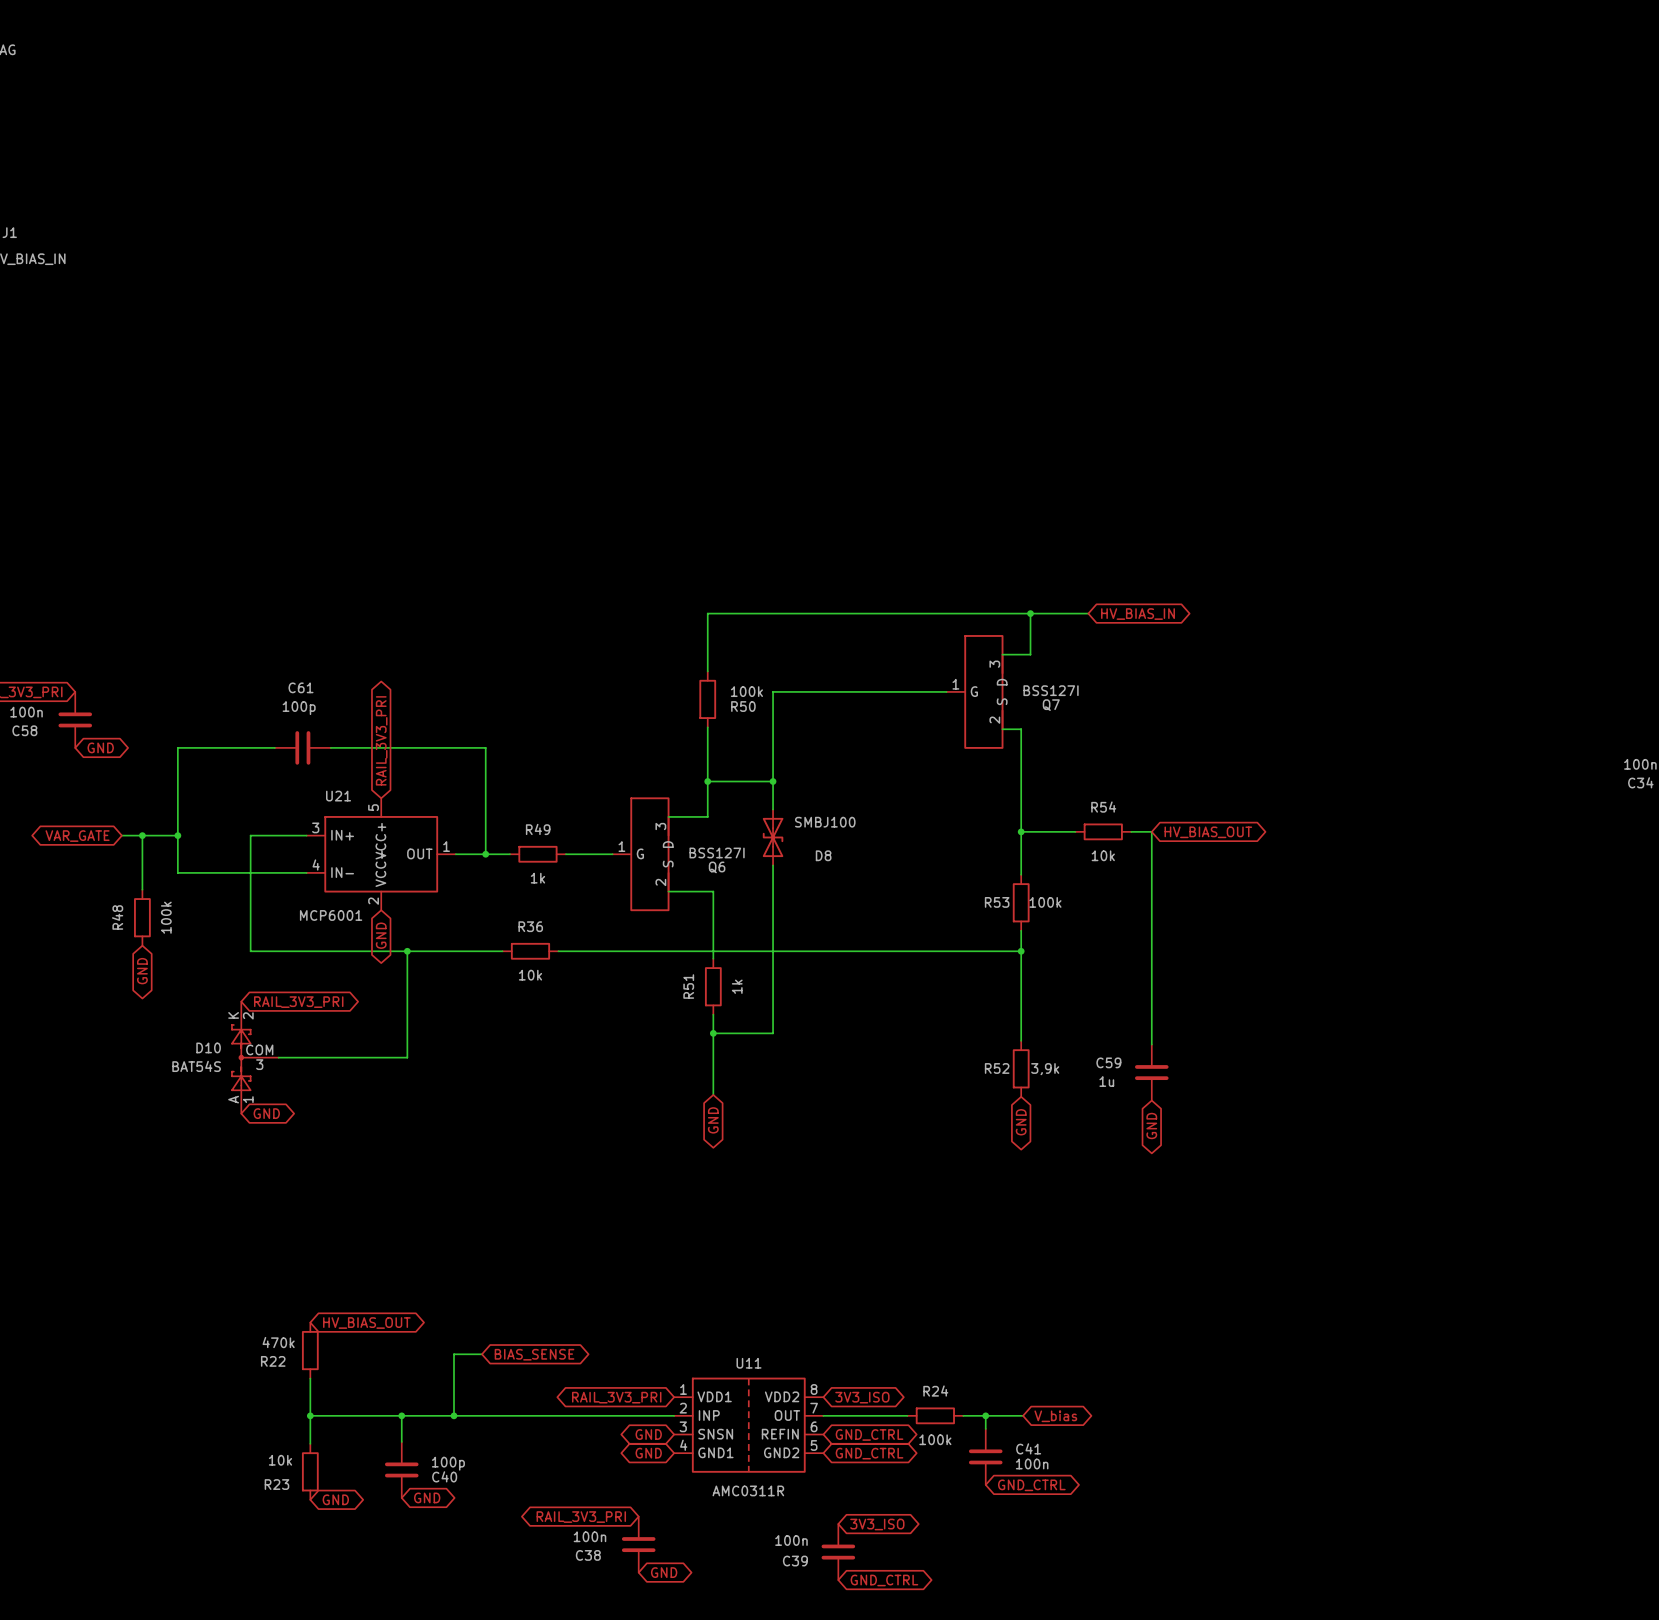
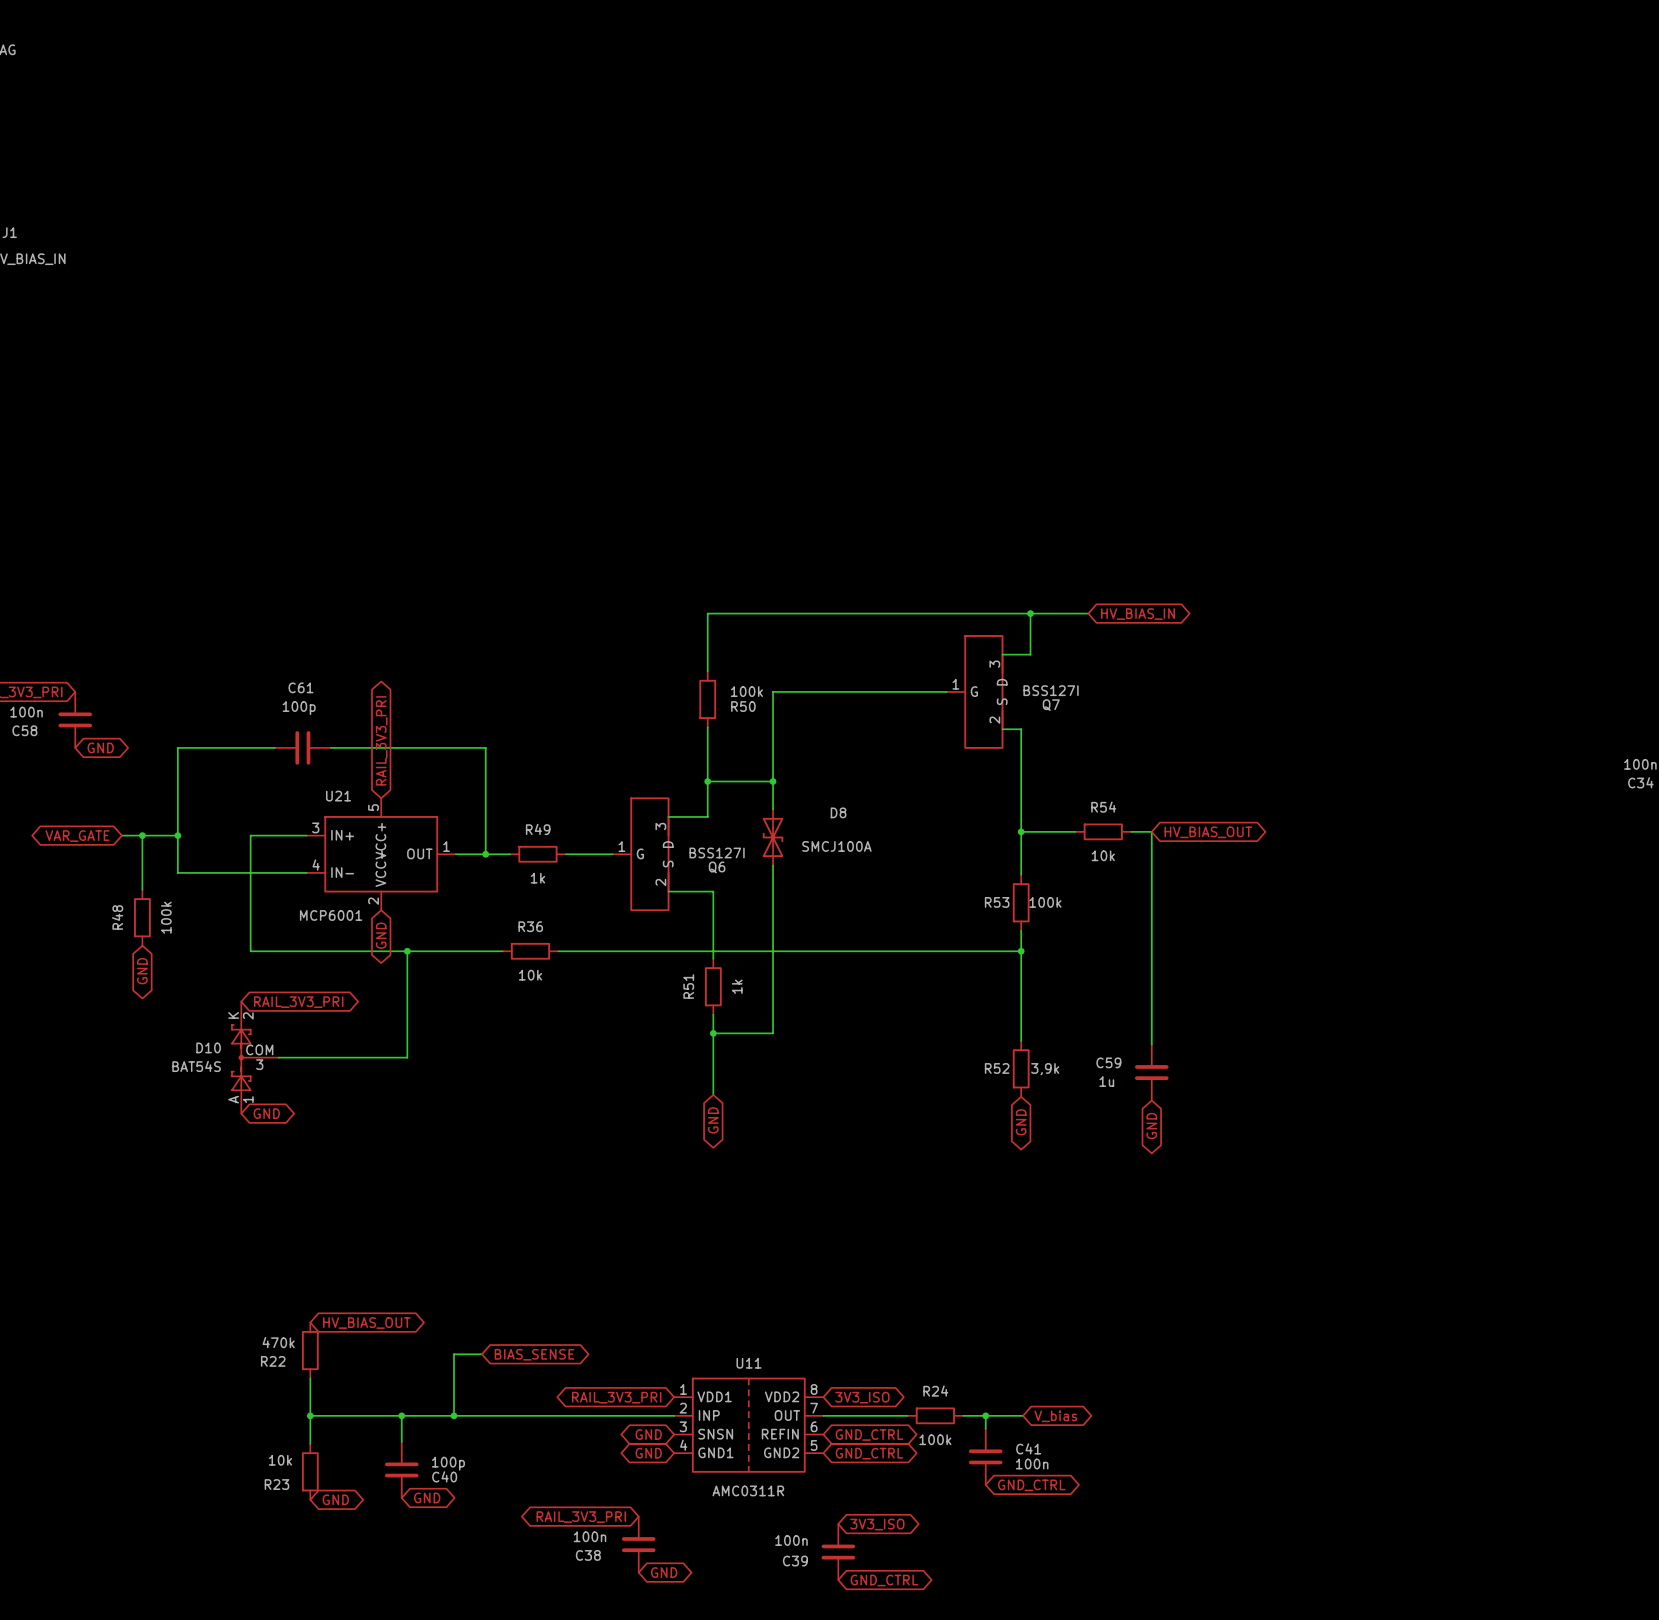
D8 value: SMBJ100 (825, 822) -> SMCJ100A (836, 846)
D8 name position: D8 (823, 855) -> D8 (838, 812)

